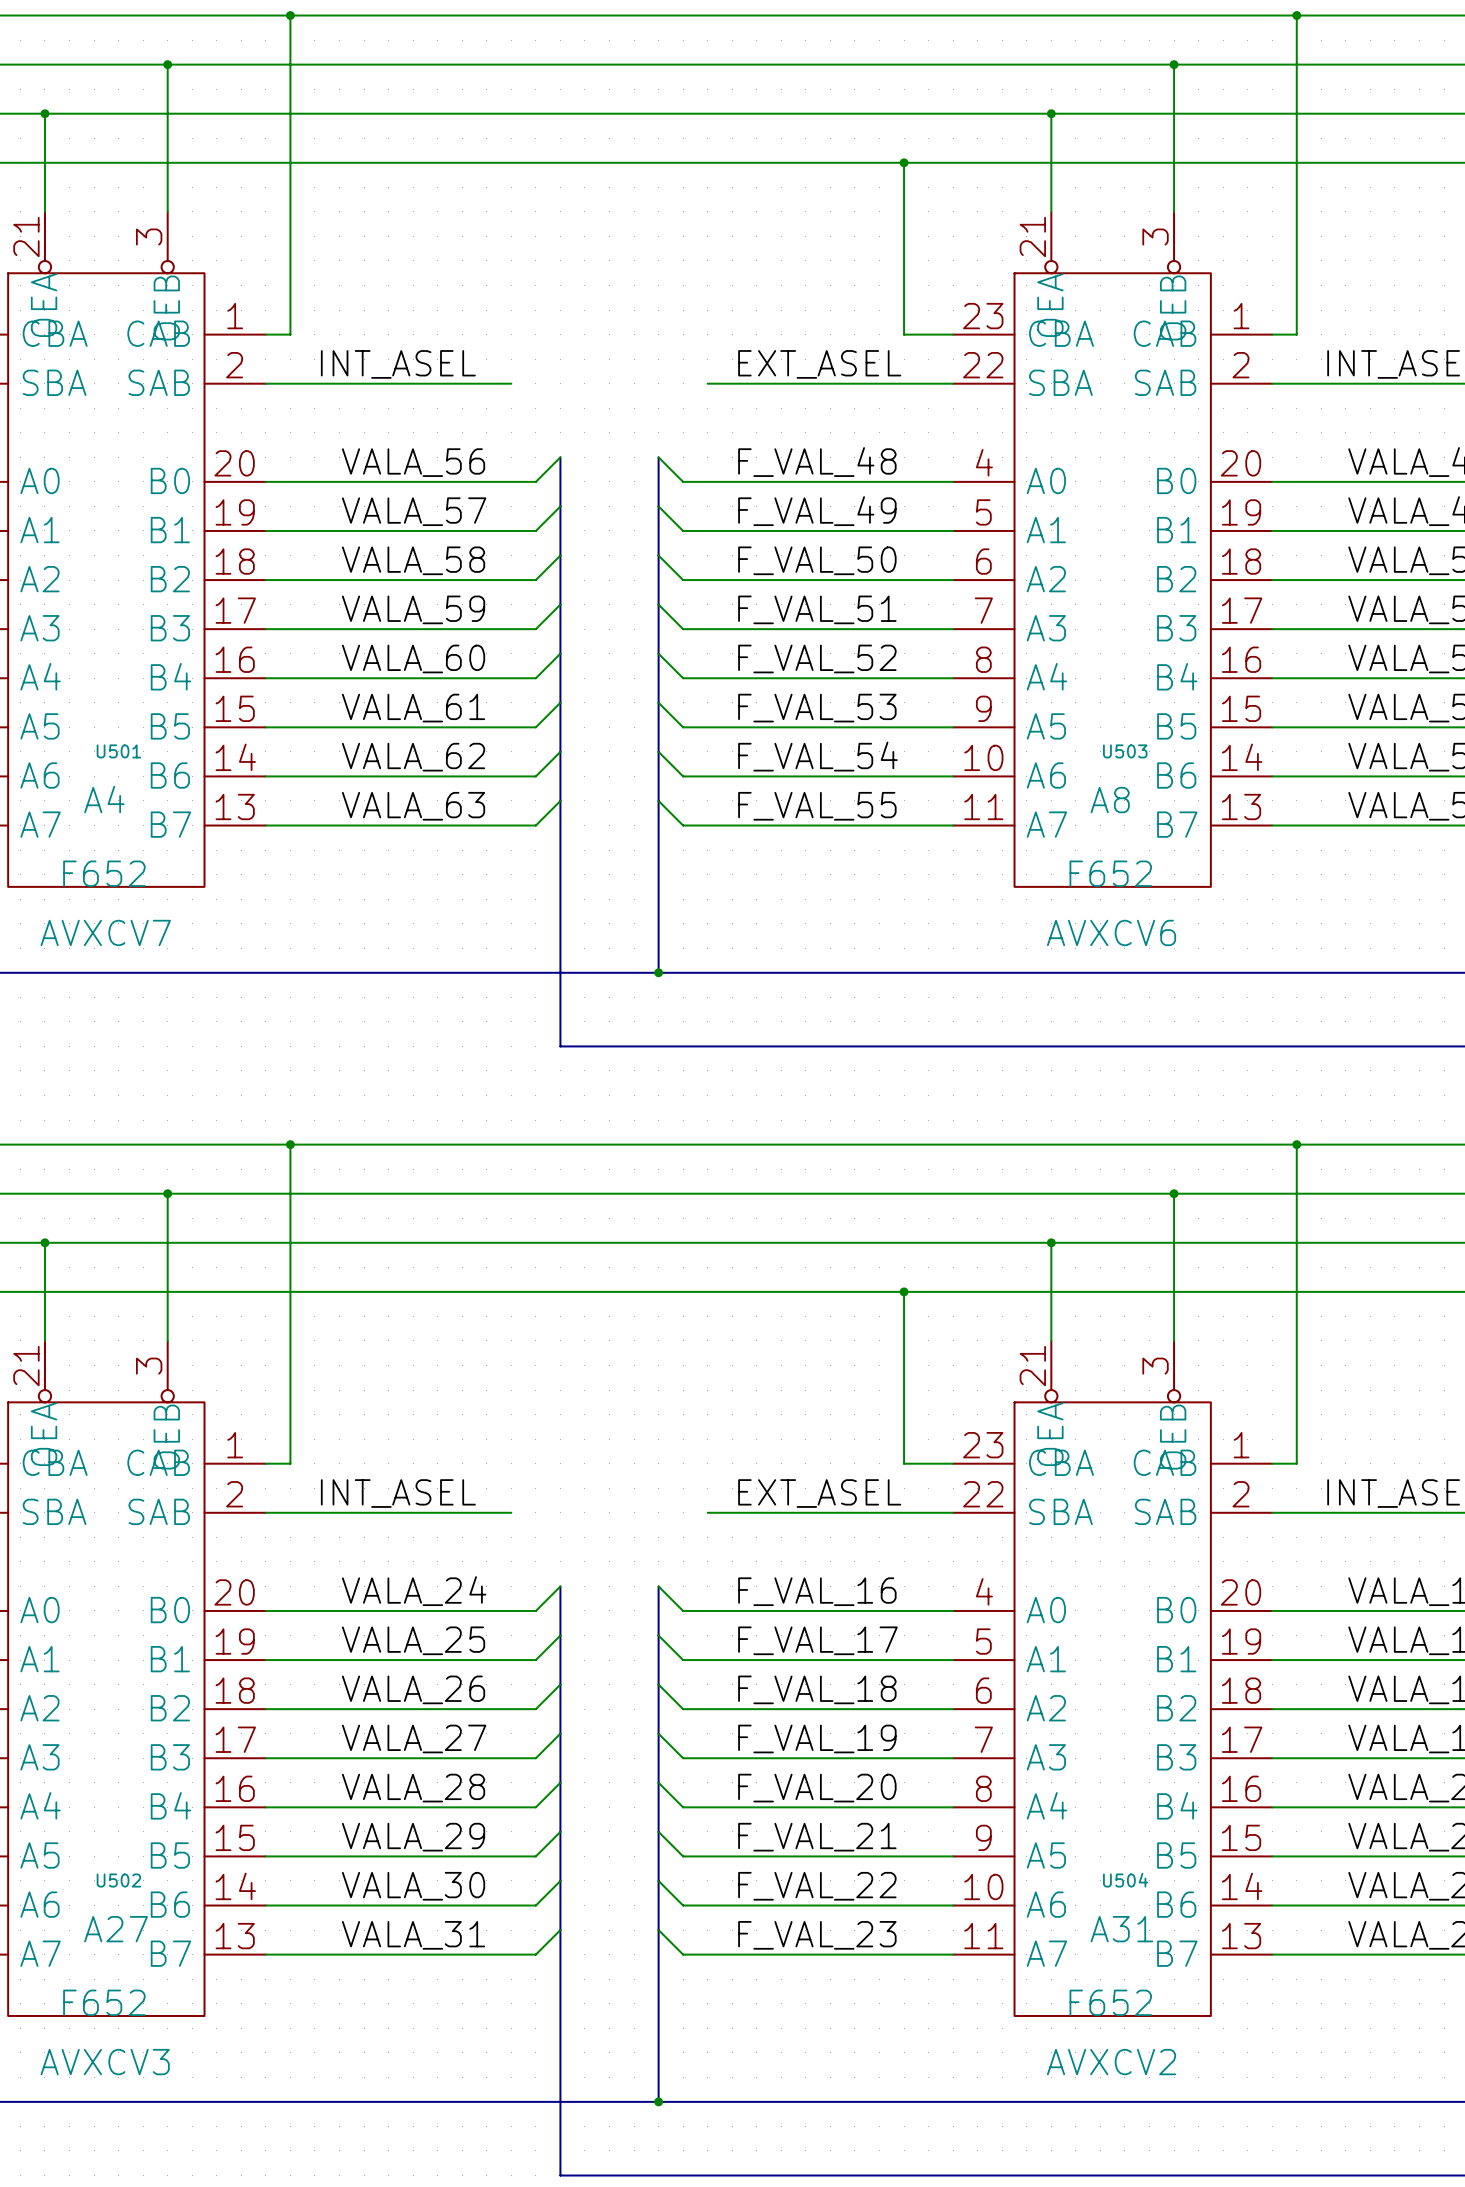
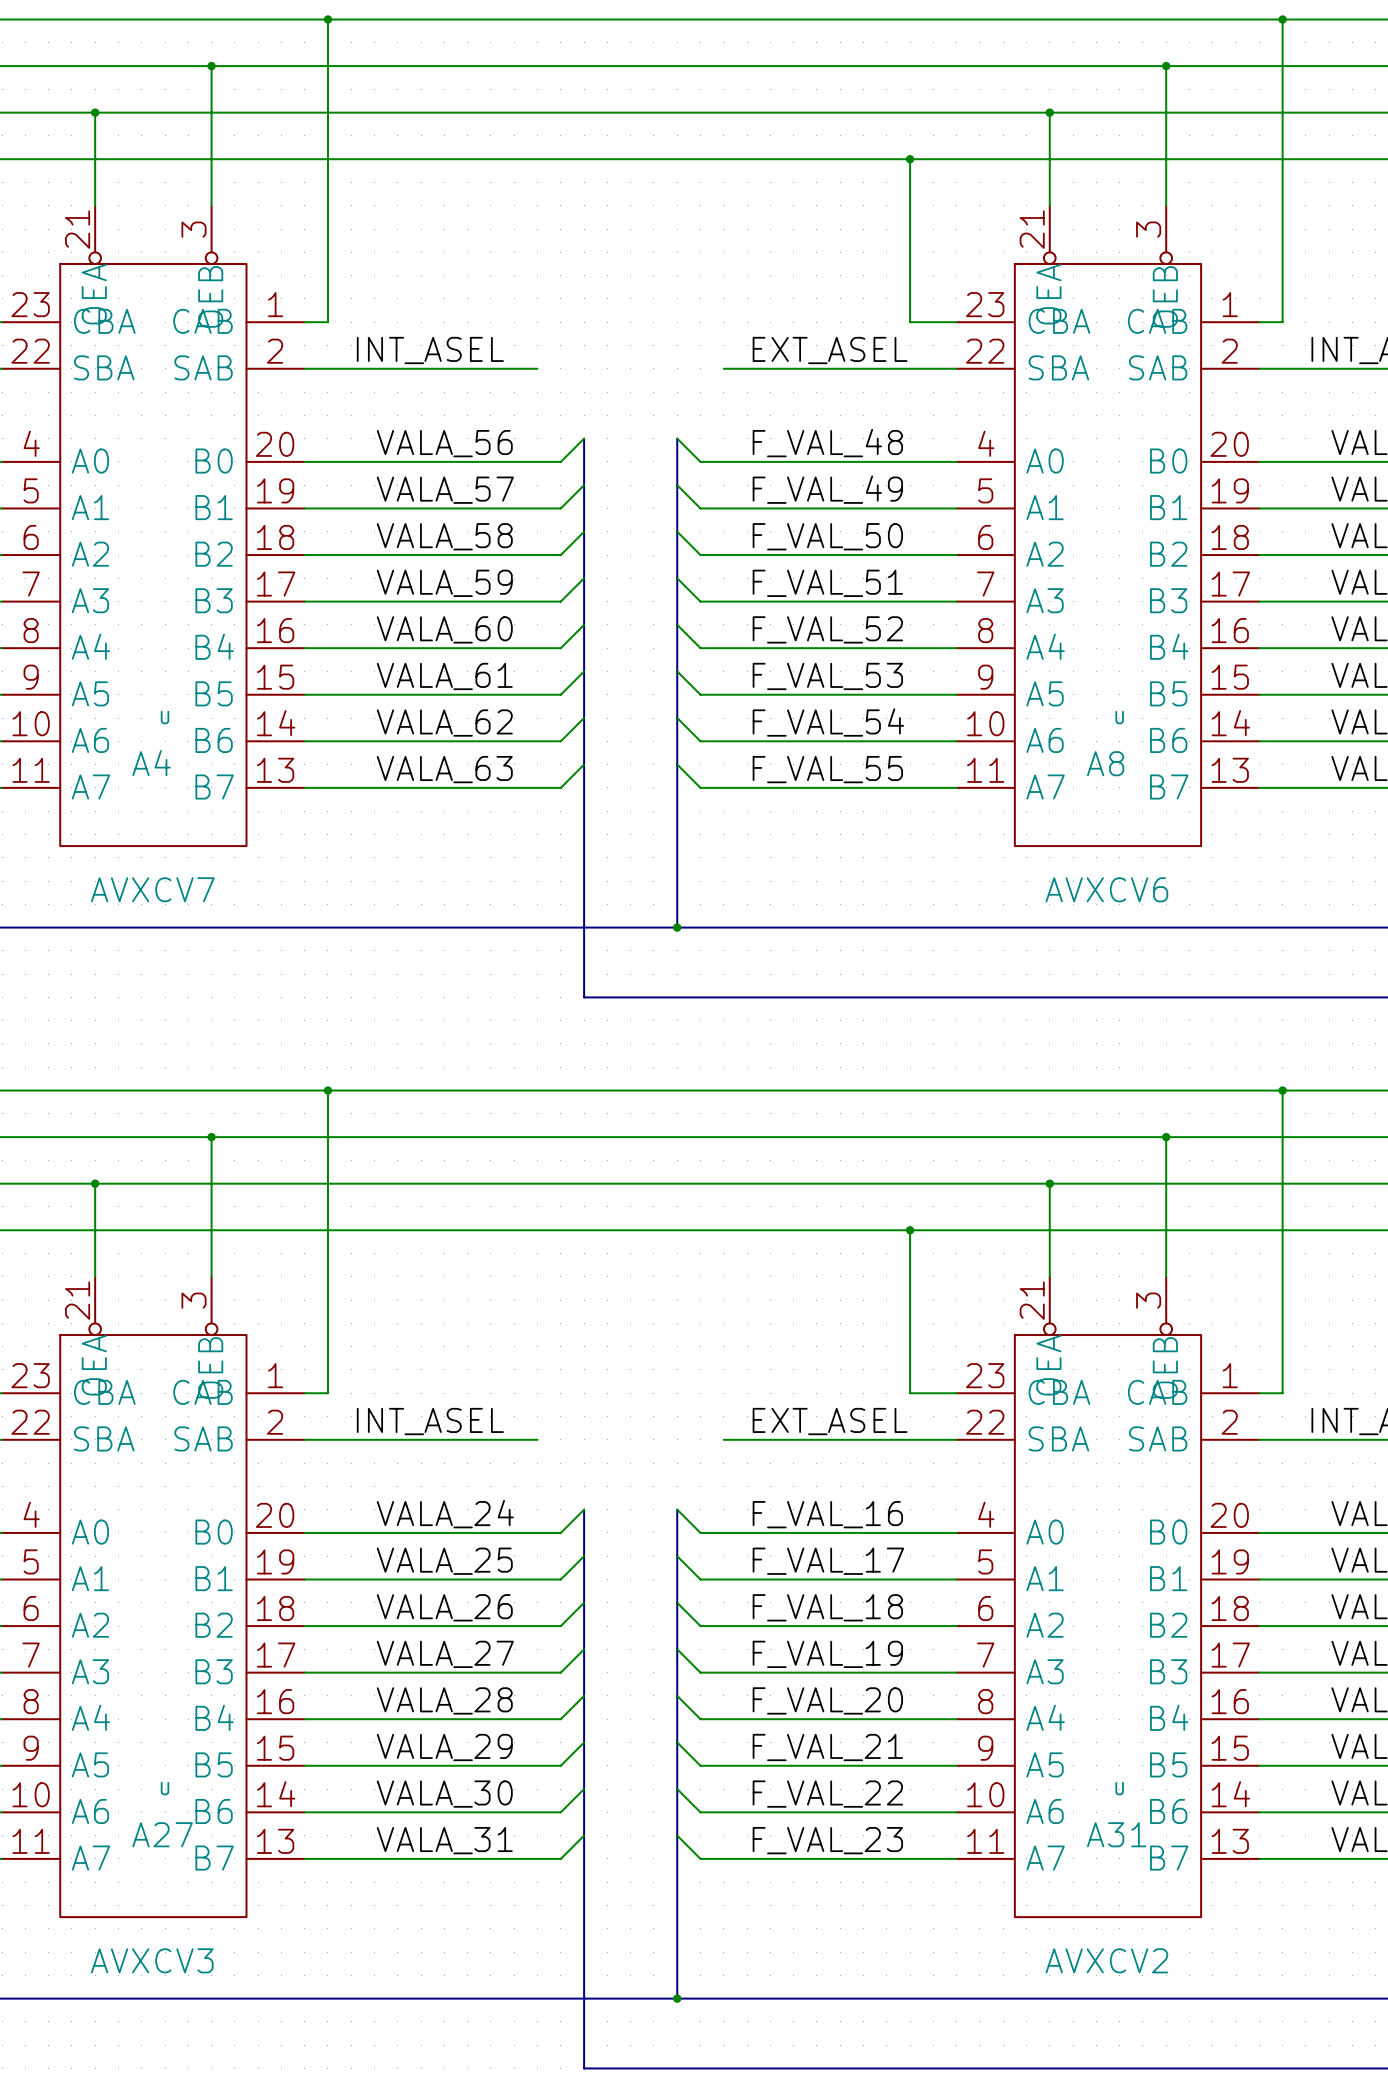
U501 name: U501 (118, 751) -> U (165, 717)
U503 name: U503 (1125, 751) -> U (1119, 717)
U501 value: F652 (104, 873) -> none
U503 value: F652 (1110, 873) -> none
U502 name: U502 (118, 1880) -> U (165, 1788)
U504 name: U504 (1125, 1880) -> U (1119, 1788)
U502 value: F652 (104, 2002) -> none
U504 value: F652 (1110, 2002) -> none

